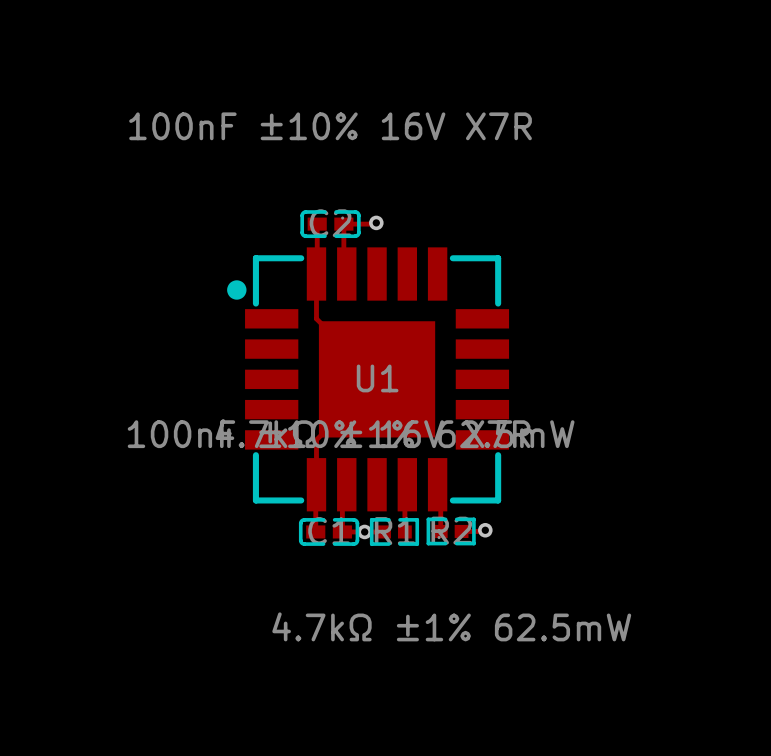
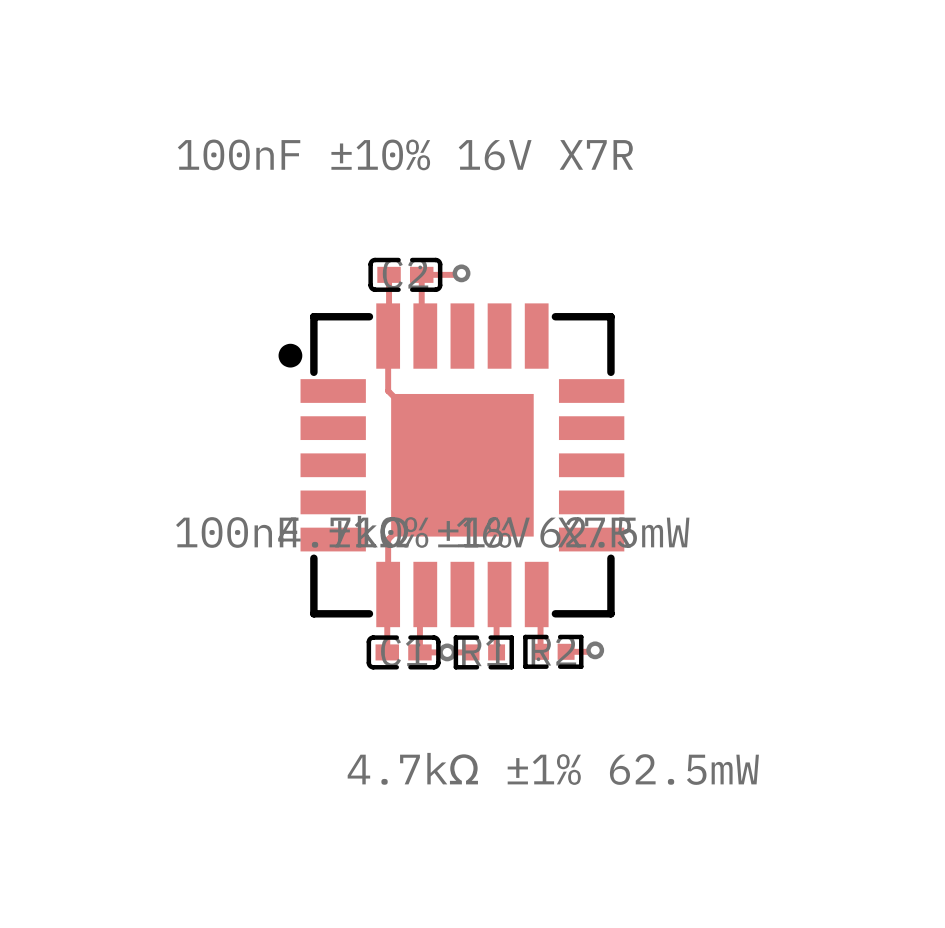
U1 name: U1 (377, 378) -> none

